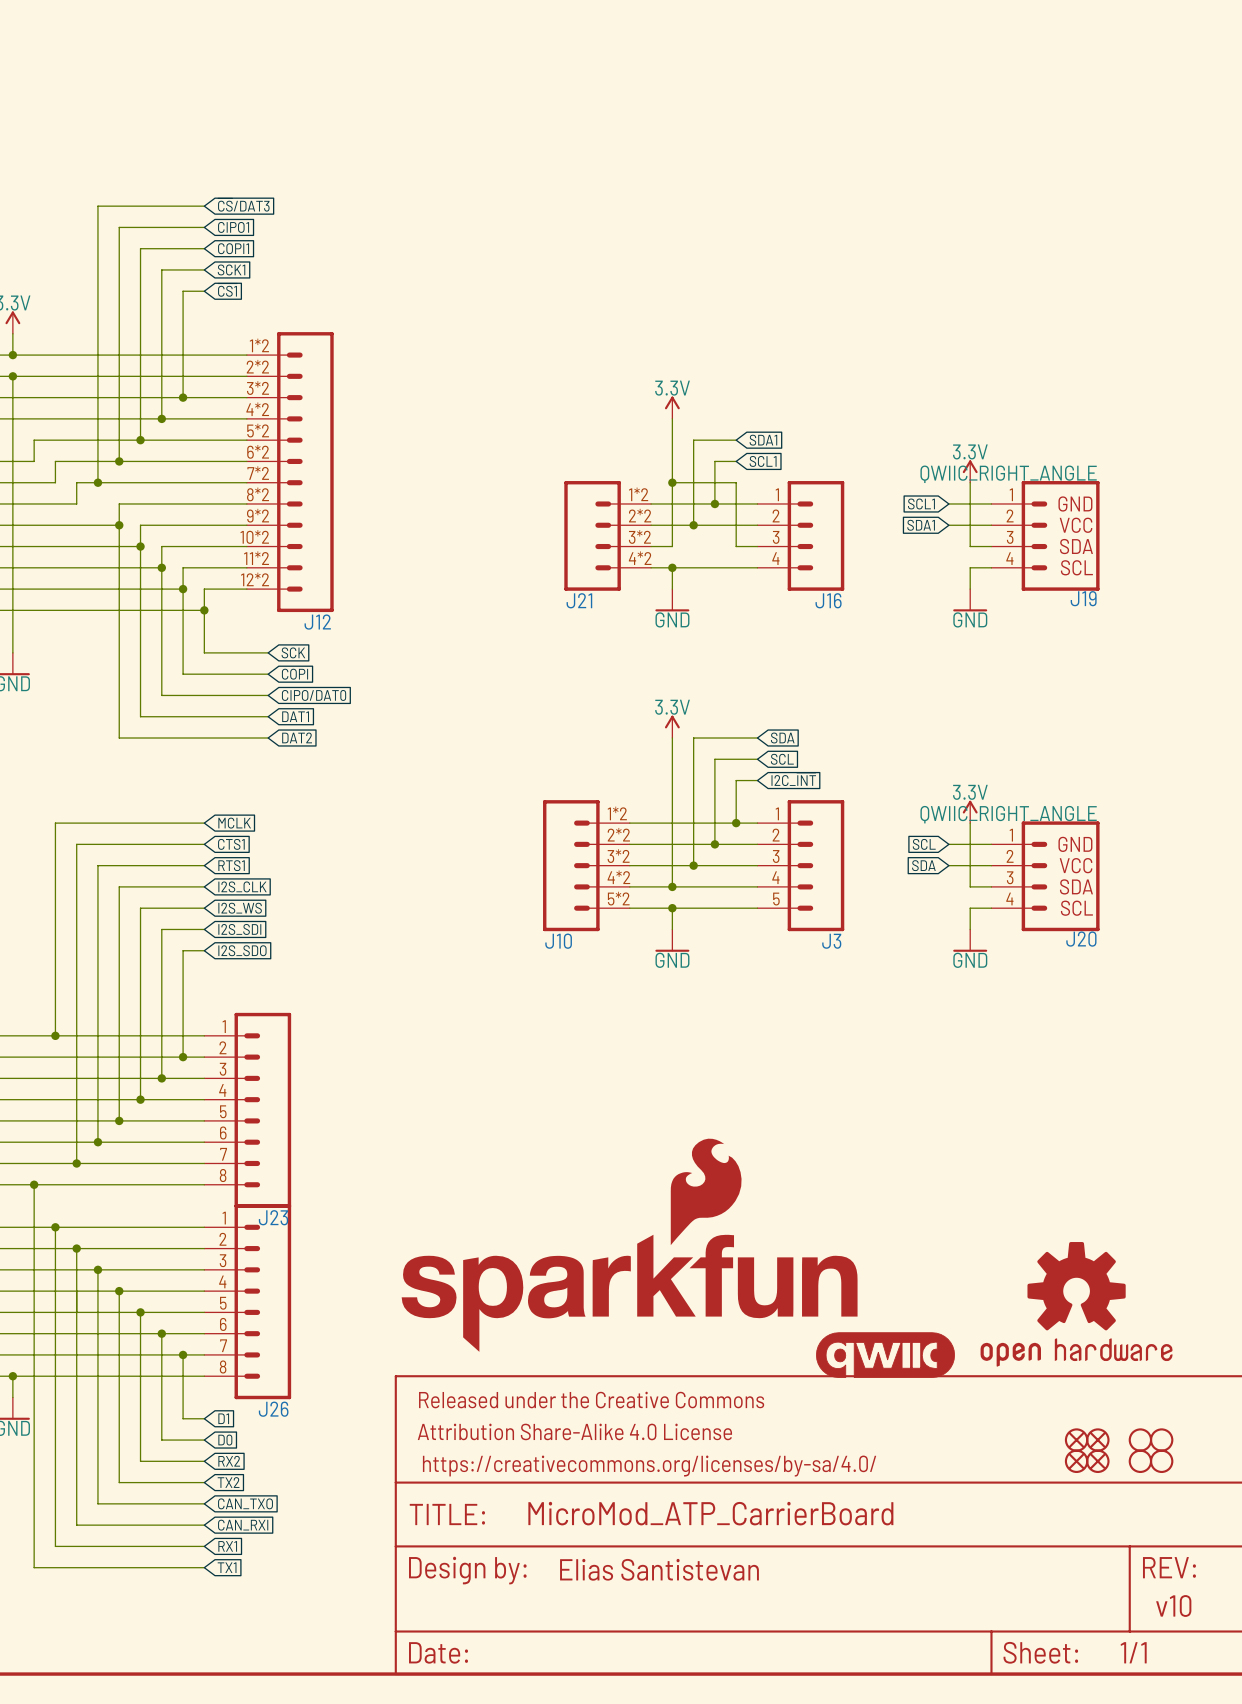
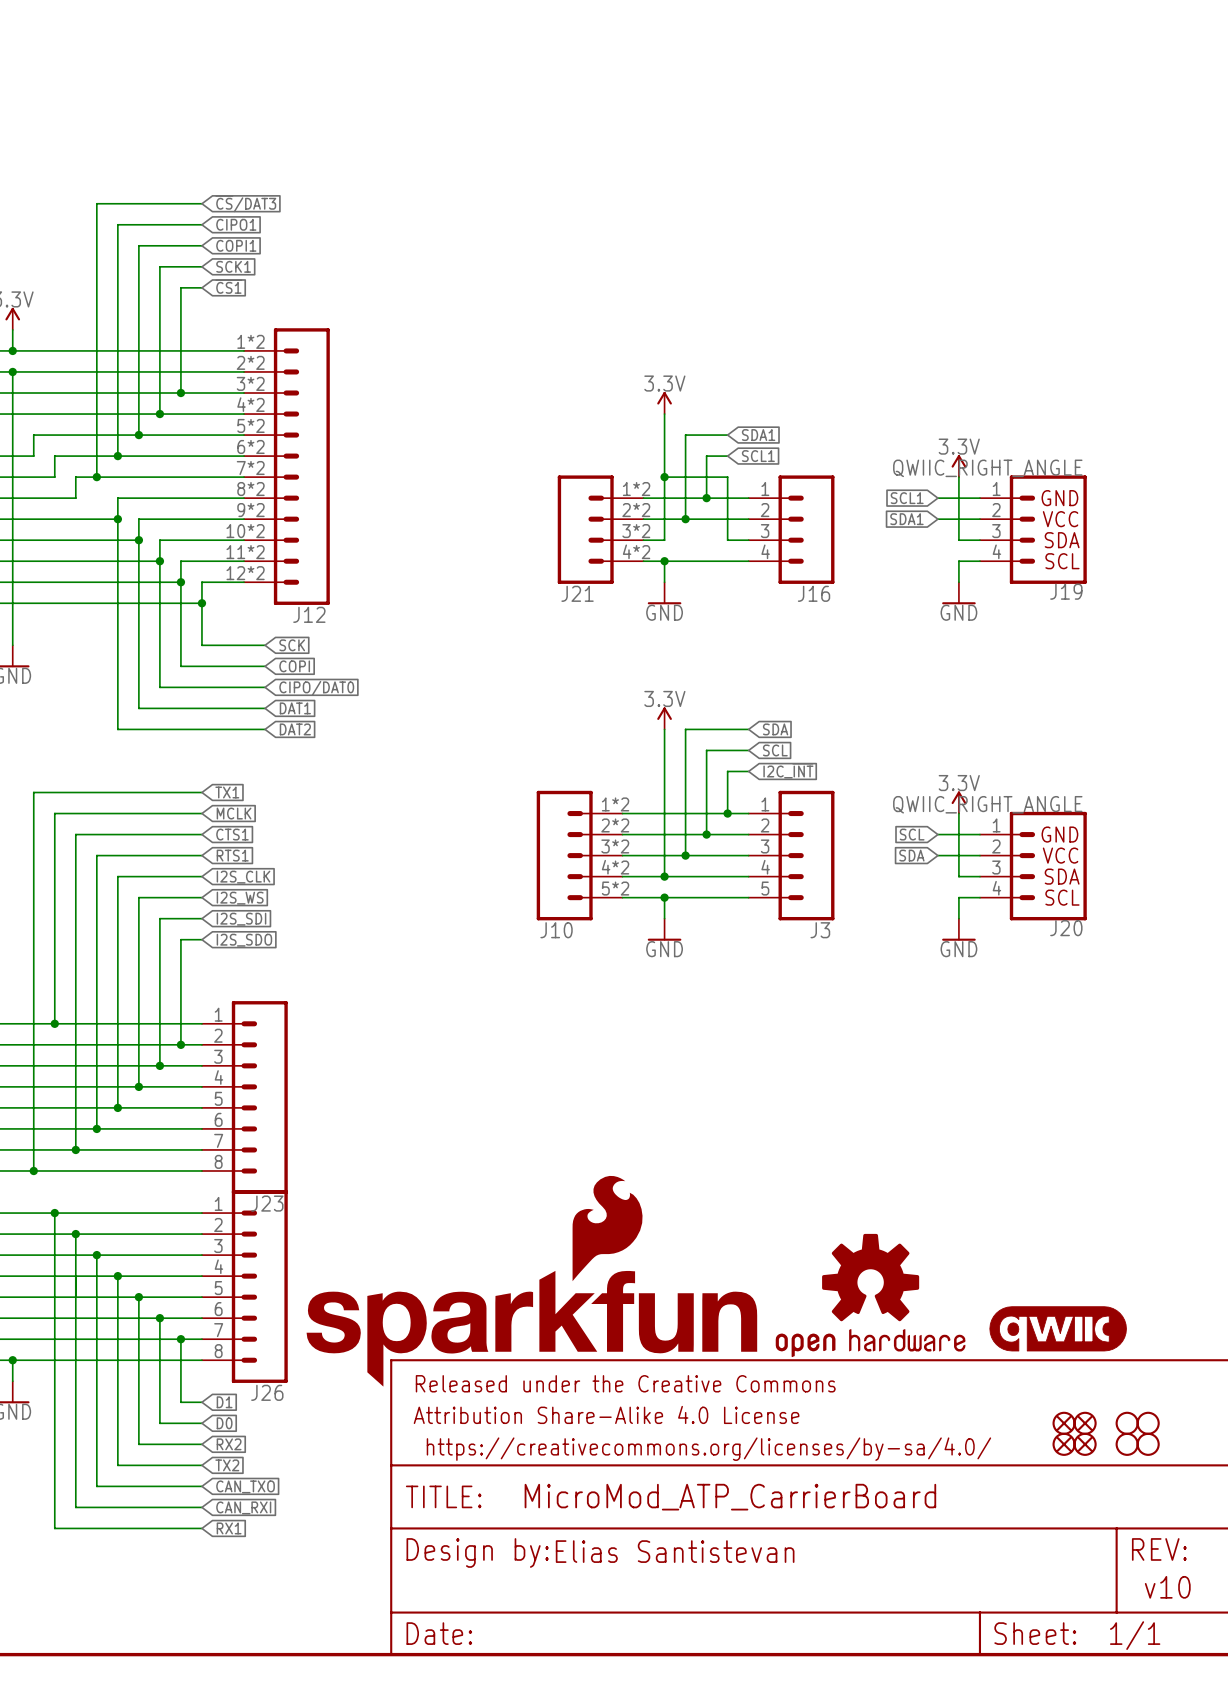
global label: none -> TX1 (227, 792)
wire: (34, 1184) (34, 1567) (204, 1567) -> (33, 1170) (33, 792) (201, 792)
part position: (629, 1245) -> (531, 1281)
part position: (1076, 1304) -> (870, 1295)
part position: (885, 1355) -> (1058, 1328)
global label: TX1 (227, 1567) -> none

